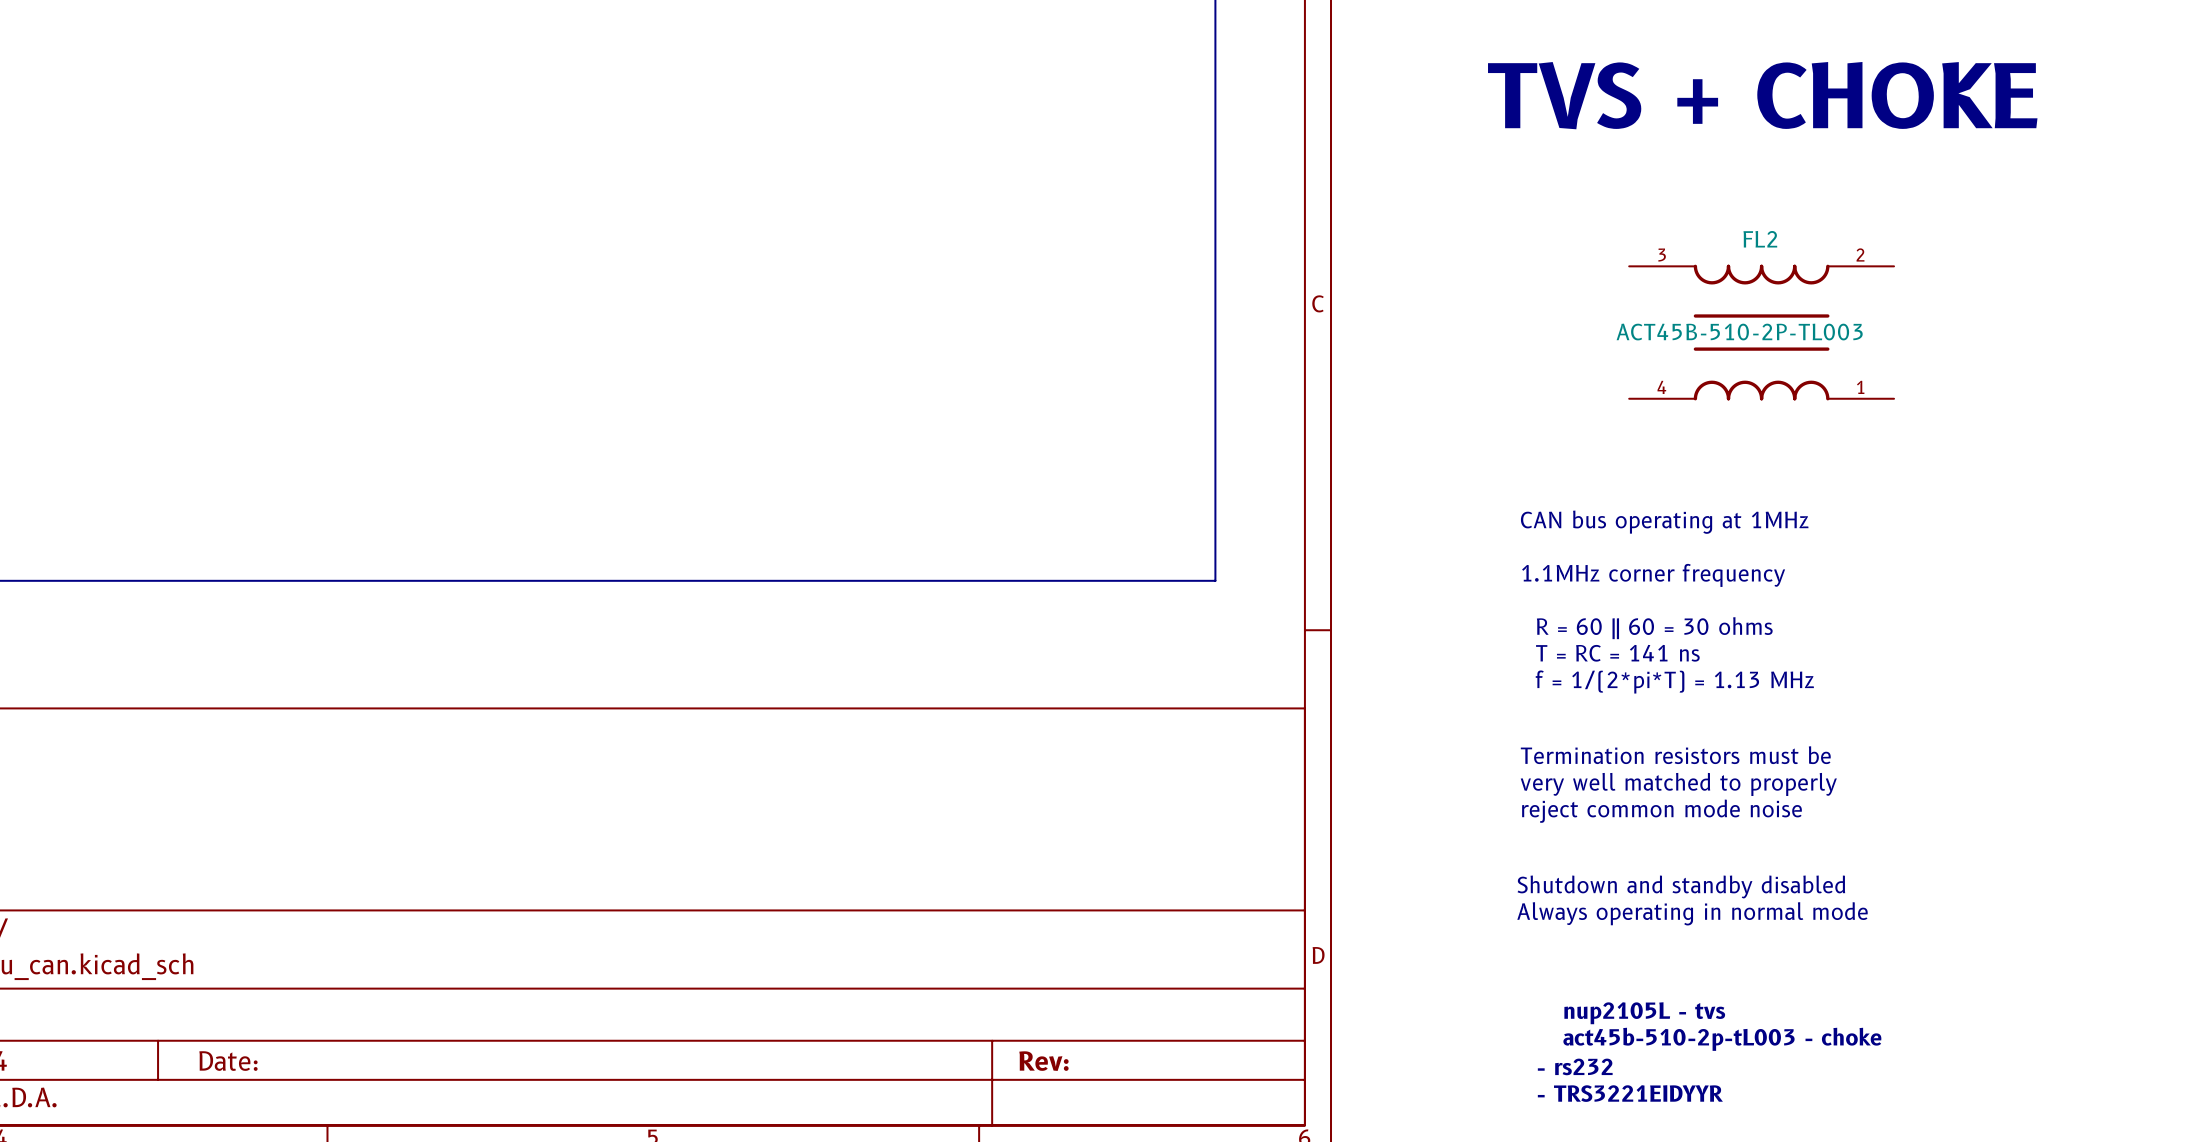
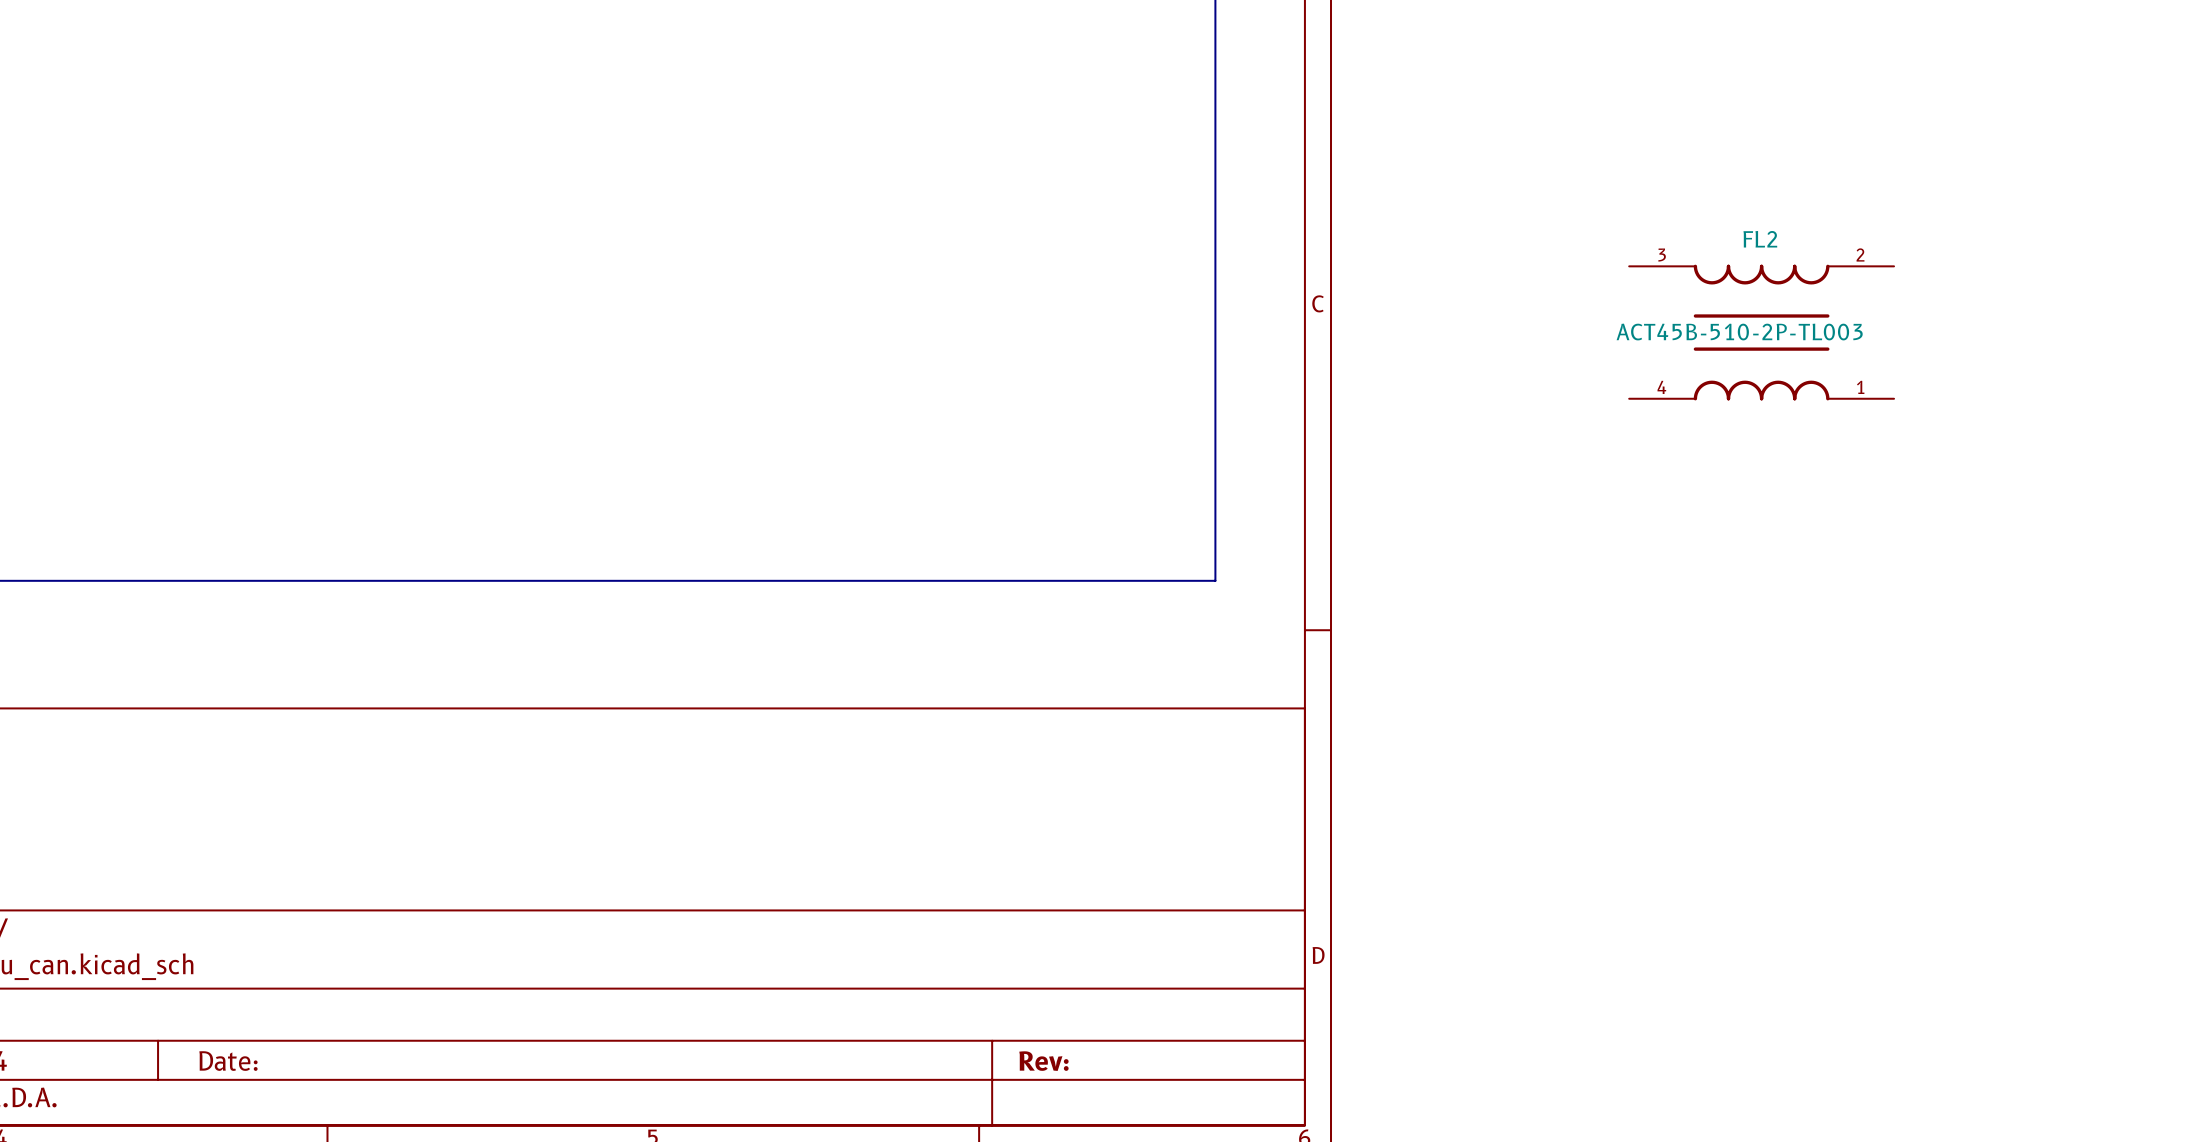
text: TVS + CHOKE (1762, 95) -> none
text: CAN bus operating at 1MHz (1664, 522) -> none
text: 1.1MHz corner frequency (1653, 575) -> none
text: R = 60 || 60 = 30 ohms (1654, 628) -> none
text: T = RC = 141 ns (1617, 653) -> none
text: f = 1/(2*pi*T) = 1.13 MHz (1674, 682) -> none
text: Termination resistors must be (1675, 755) -> none
text: very well matched to properly (1678, 784) -> none
text: reject common mode noise (1662, 811) -> none
text: Shutdown and standby disabled (1681, 886) -> none
text: Always operating in normal mode (1692, 913) -> none
text: nup2105L - tvs (1644, 1013) -> none
text: act45b-510-2p-tL003 - choke (1722, 1039) -> none
text: - rs232 (1575, 1066) -> none
text: - TRS3221EIDYYR (1630, 1093) -> none

